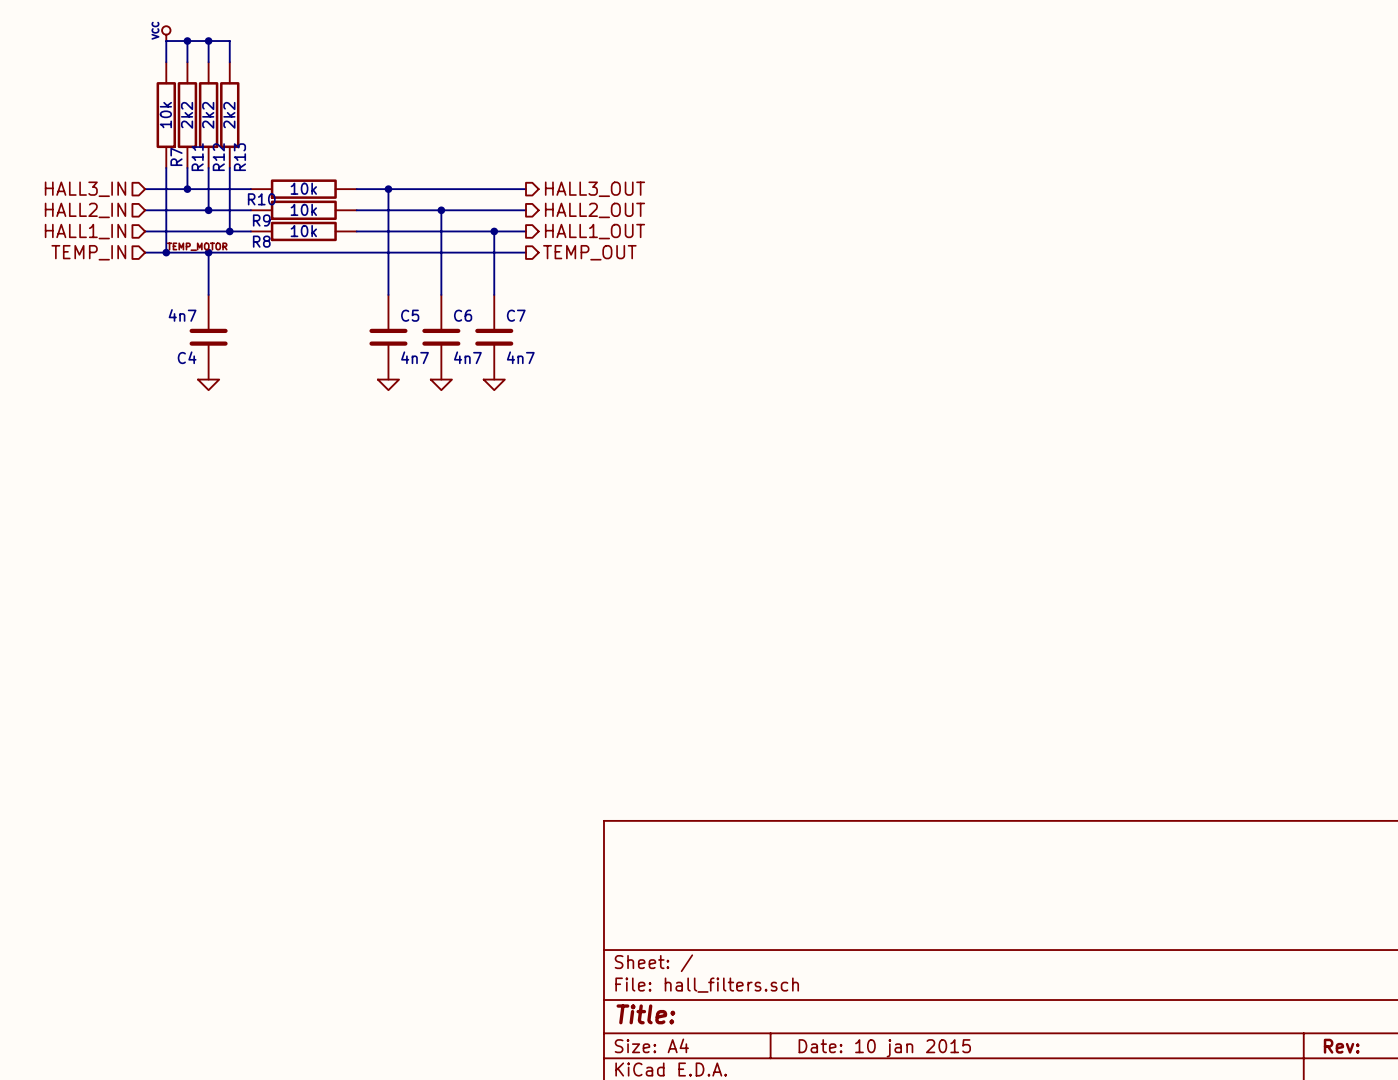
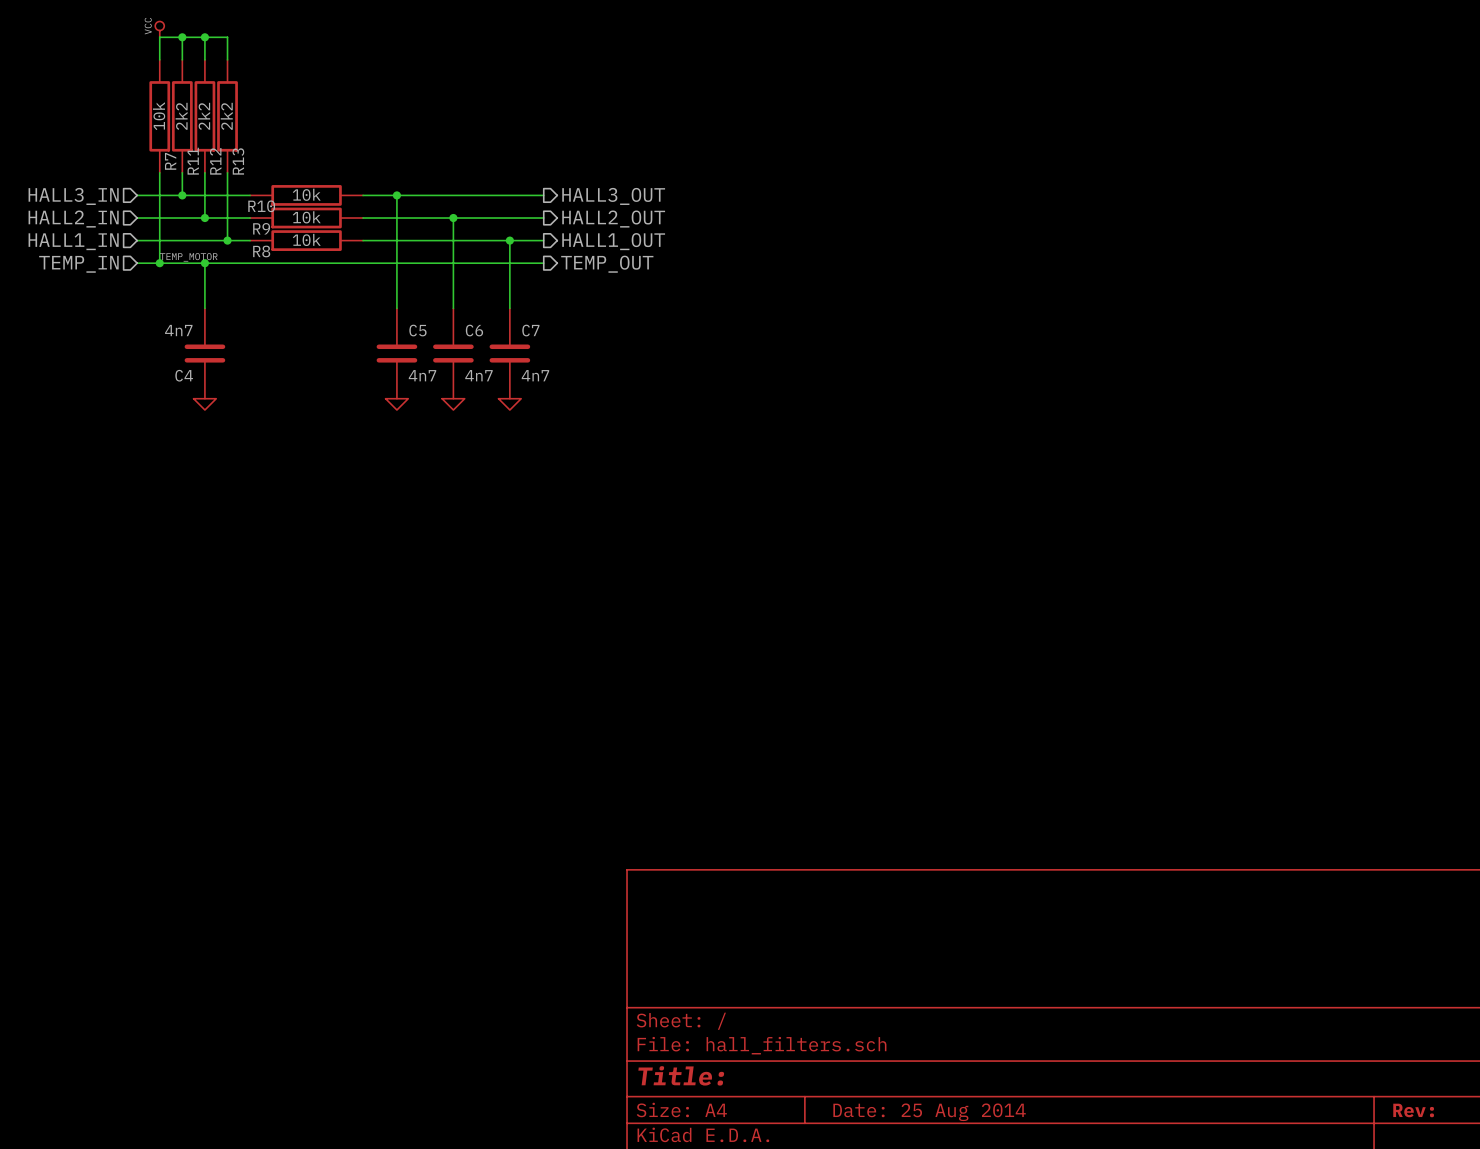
title block: Date: 10 jan 2015 (884, 1048) -> Date: 25 Aug 2014 (929, 1112)

